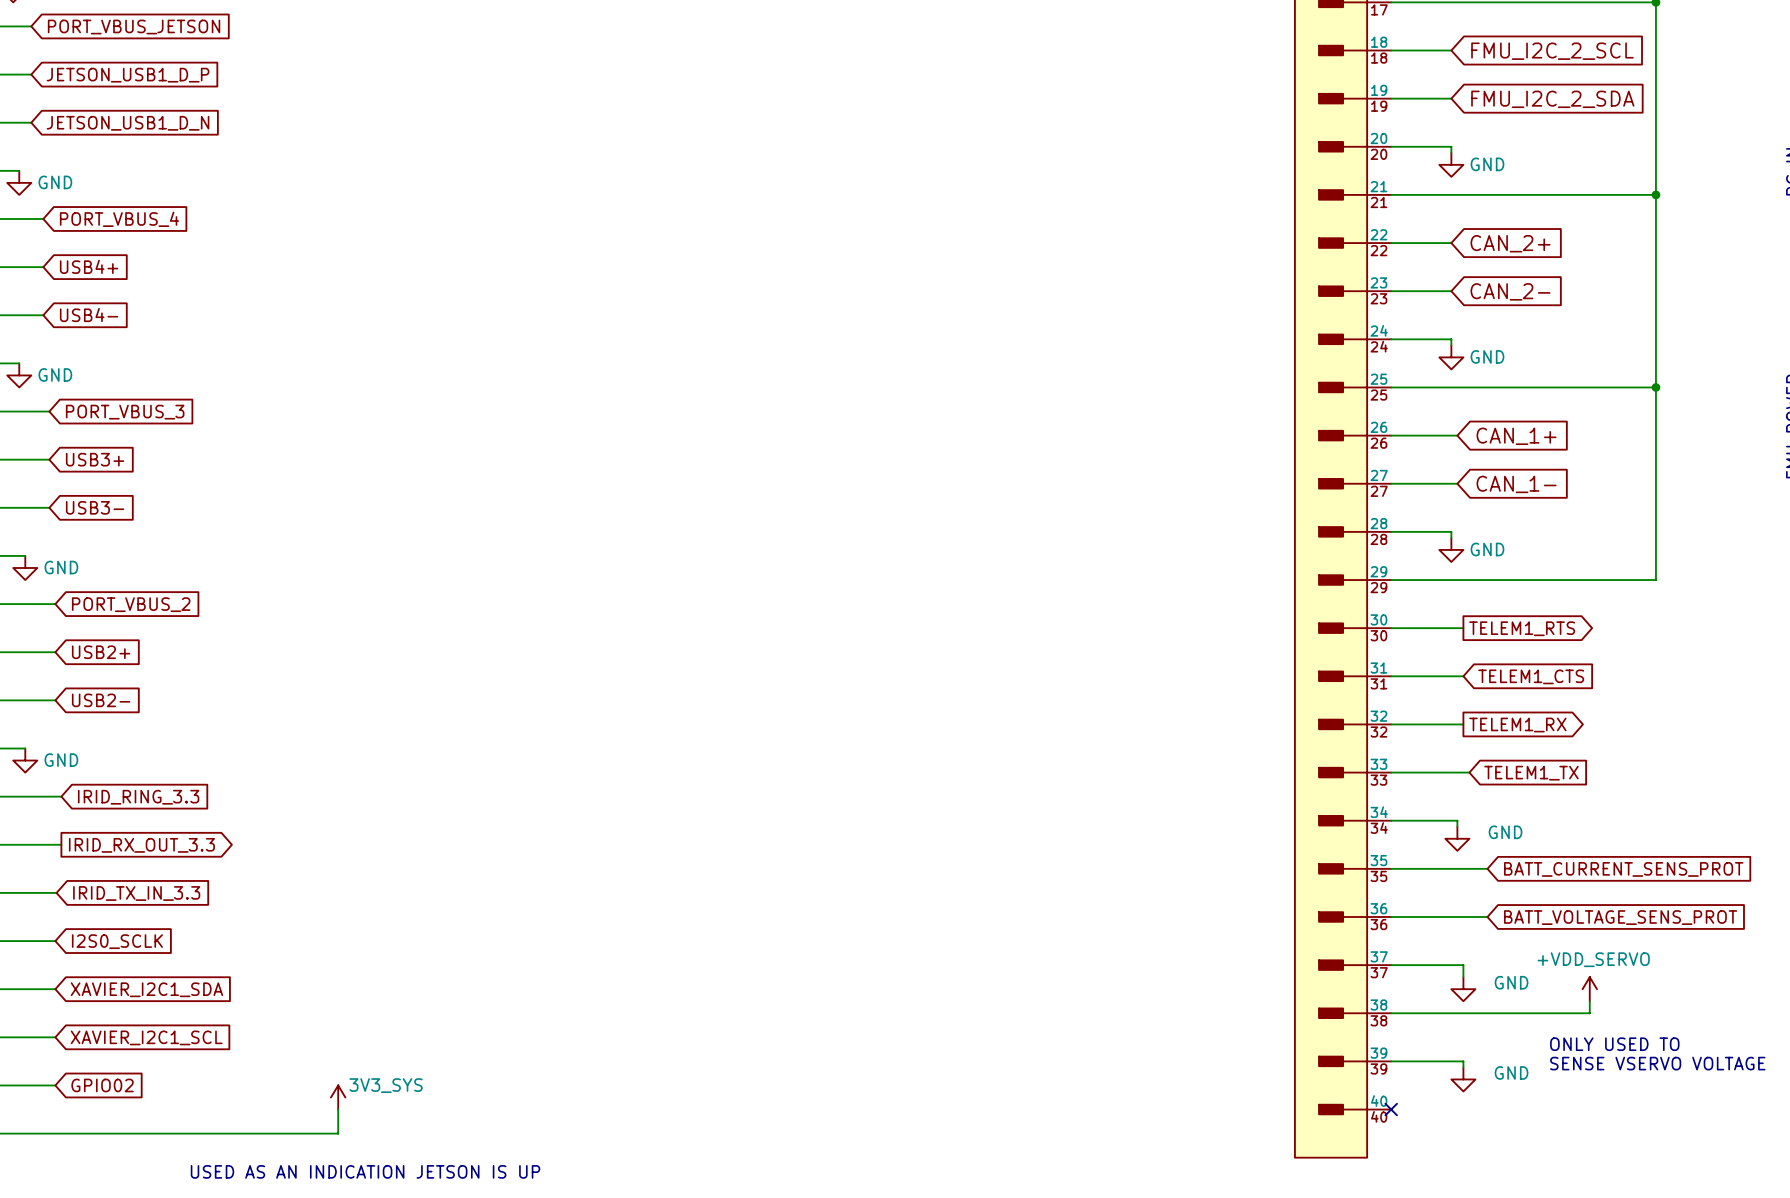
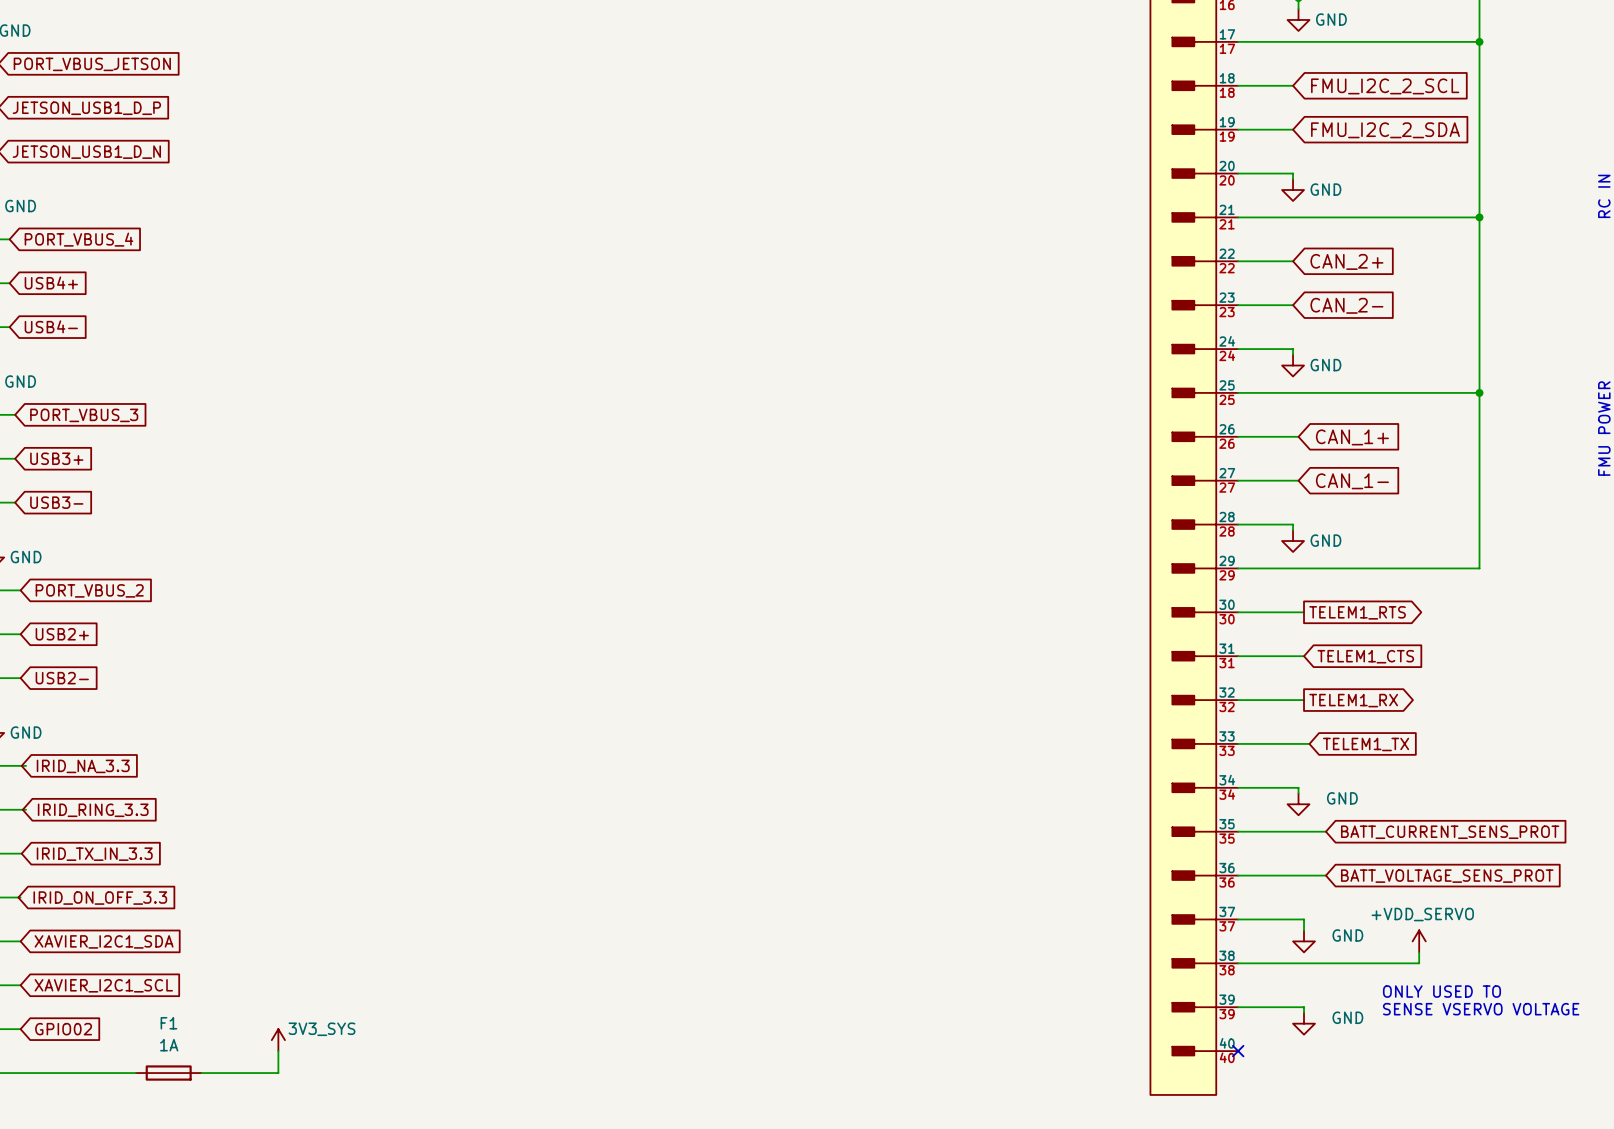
global label: IRID_RING_3.3 (138, 797) -> IRID_NA_3.3 (83, 766)
global label shape: output (141, 845) -> input (93, 810)
global label: IRID_RX_OUT_3.3 (141, 845) -> IRID_RING_3.3 (93, 810)
global label: I2S0_SCLK (117, 941) -> IRID_ON_OFF_3.3 (100, 898)
F1: none -> 1A (168, 1073)
text: USED AS AN INDICATION JETSON IS UP (365, 1171) -> none

